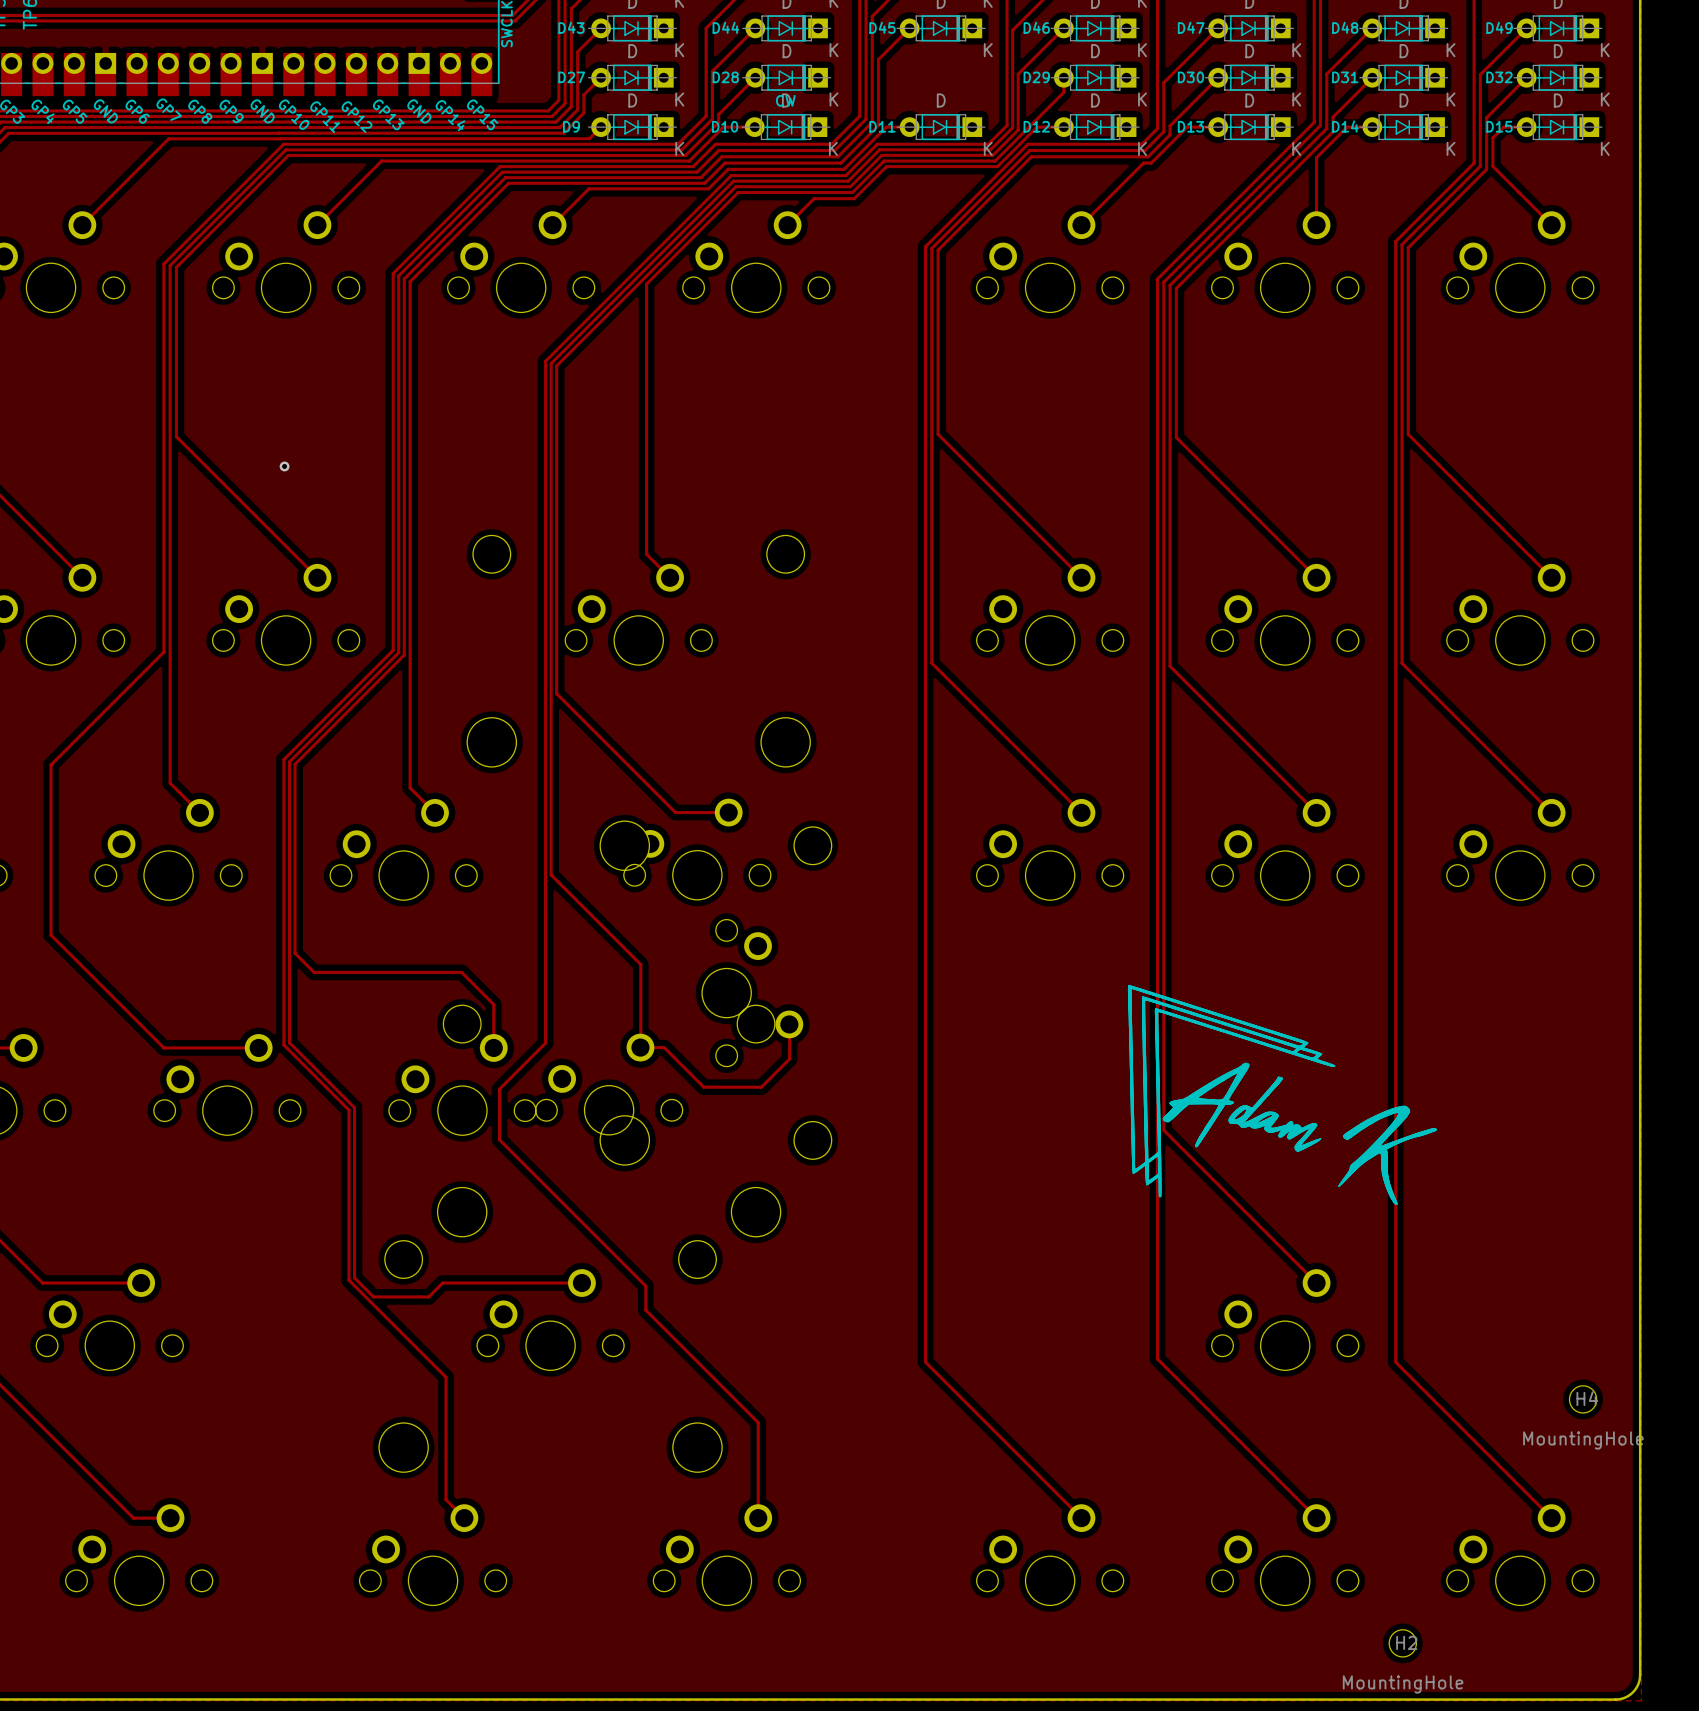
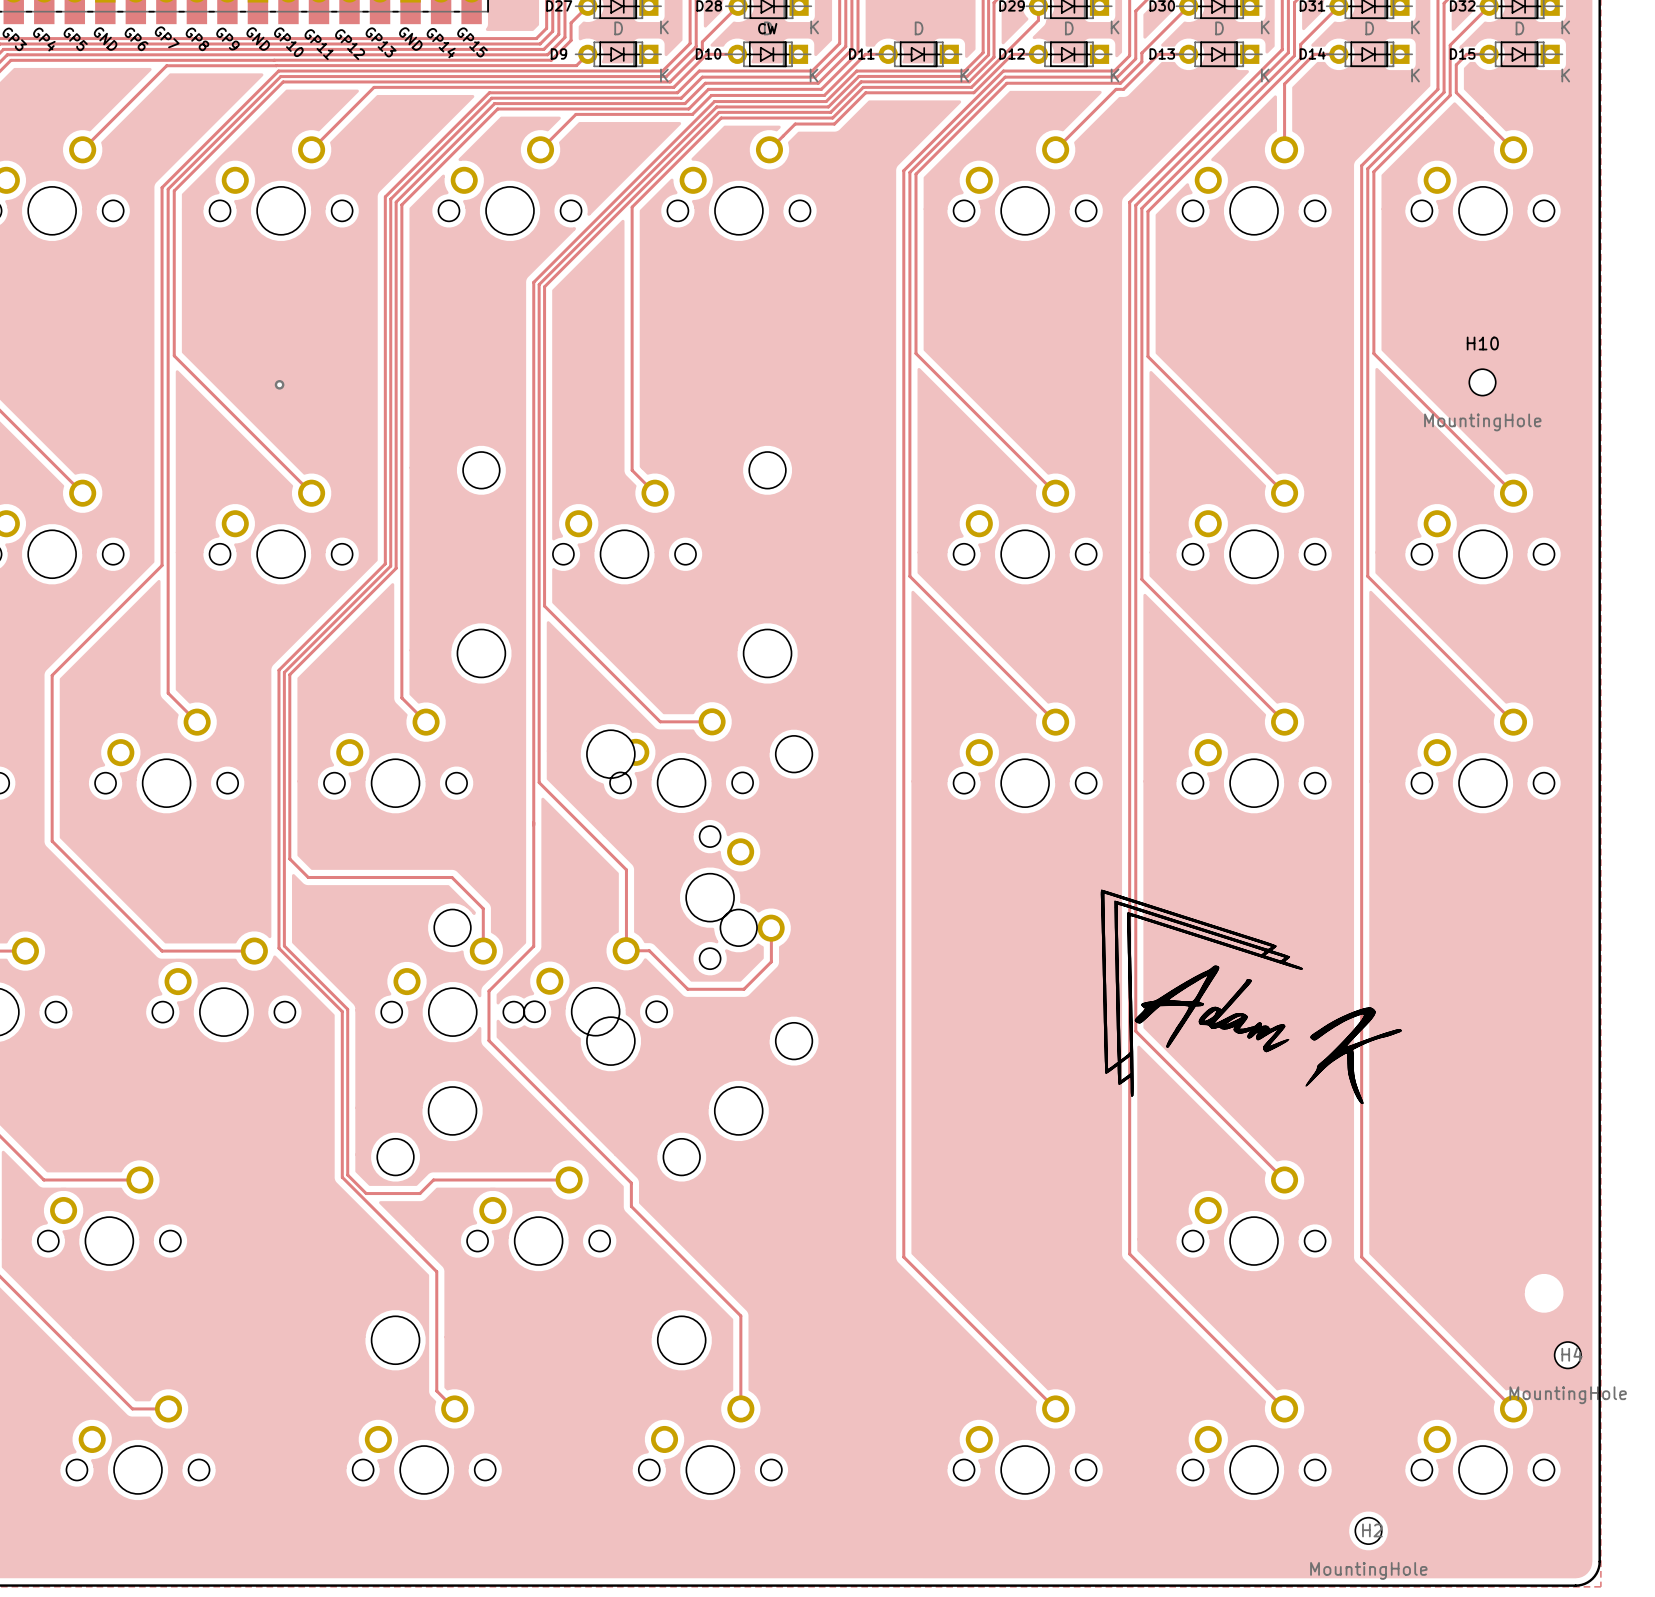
H10: none -> MountingHole (1482, 382)
H4 position: (1583, 1399) -> (1567, 1355)

